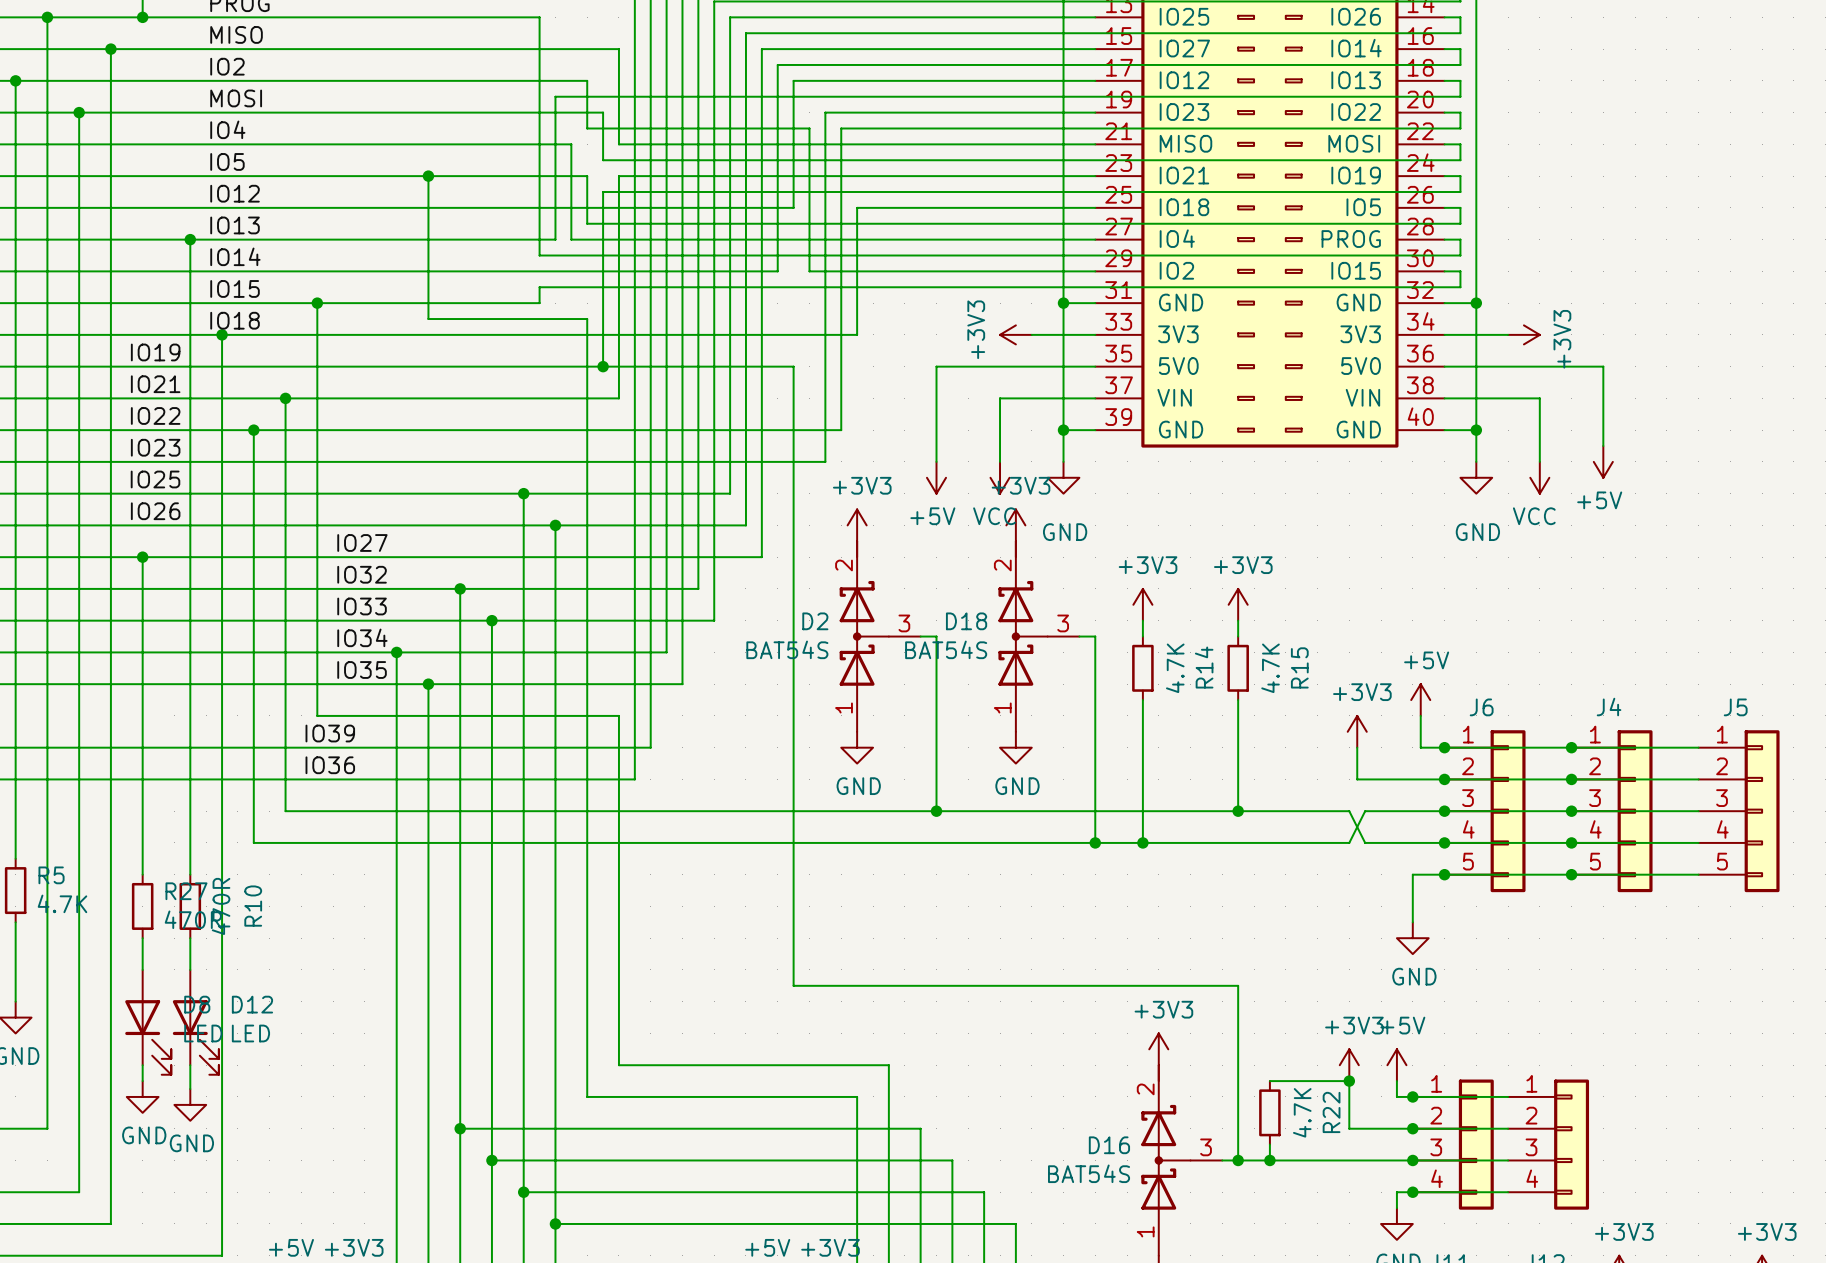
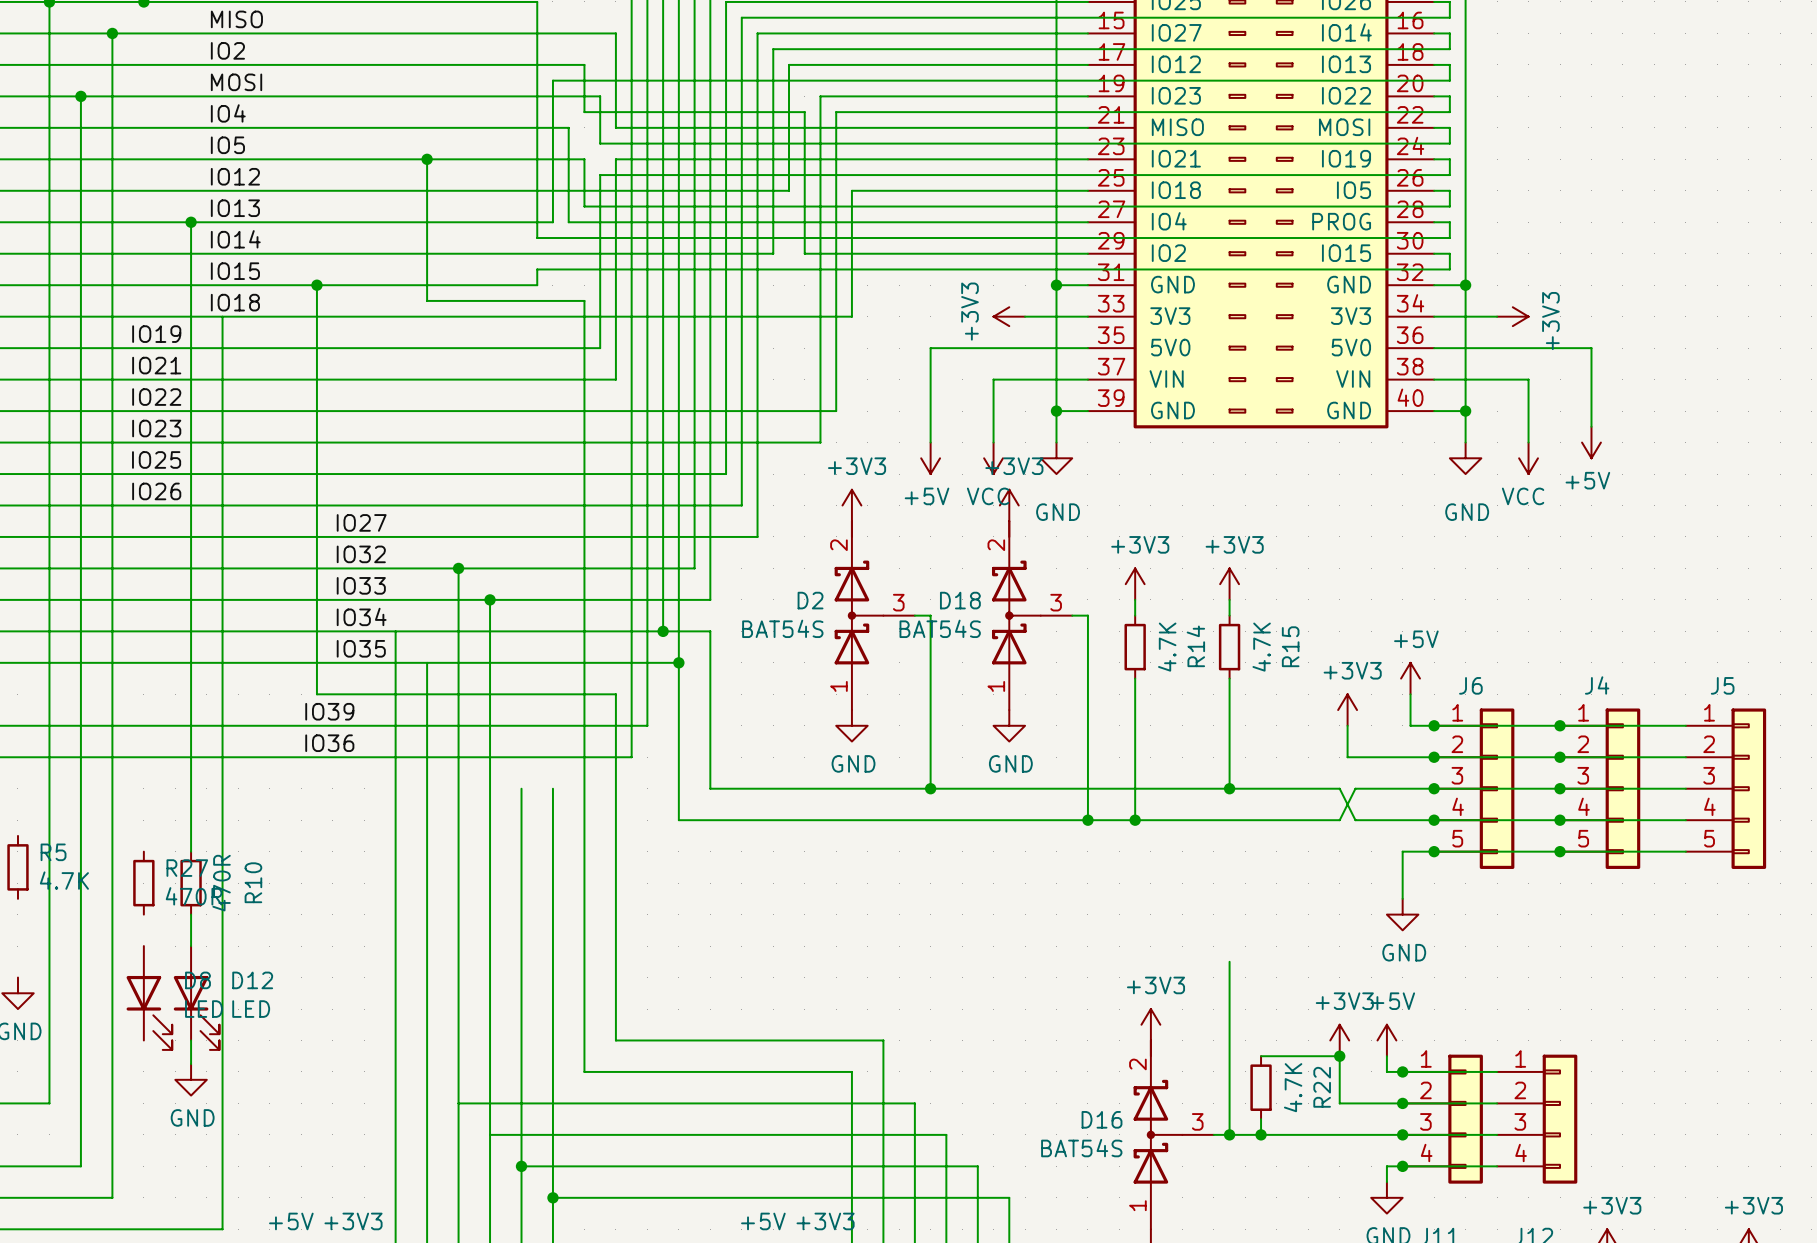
wire: (15, 80) (15, 858) -> none
junction: (15, 80) -> none
junction: (222, 334) -> none
wire: (603, 366) (793, 366) (793, 985) (1238, 985) -> none
junction: (603, 366) -> none
wire: (285, 398) (285, 811) (714, 811) -> (663, 631) (710, 631) (710, 788)
junction: (285, 398) -> none
wire: (253, 430) (253, 842) (682, 842) -> (678, 662) (678, 820)
junction: (253, 430) -> none
wire: (523, 493) (523, 811) -> none
junction: (523, 493) -> none
wire: (555, 525) (555, 811) -> none
junction: (555, 525) -> none
wire: (142, 557) (142, 874) -> none
junction: (142, 557) -> none
junction: (396, 652) -> none
junction: none -> (663, 631)
junction: (428, 684) -> none
junction: none -> (678, 662)
wire: (15, 922) (15, 1001) -> none
wire: (142, 938) (142, 969) -> none
wire: (142, 1065) (142, 1081) -> none
power symbol: GND (142, 1096) -> none
junction: (460, 1128) -> none
junction: (491, 1160) -> none

